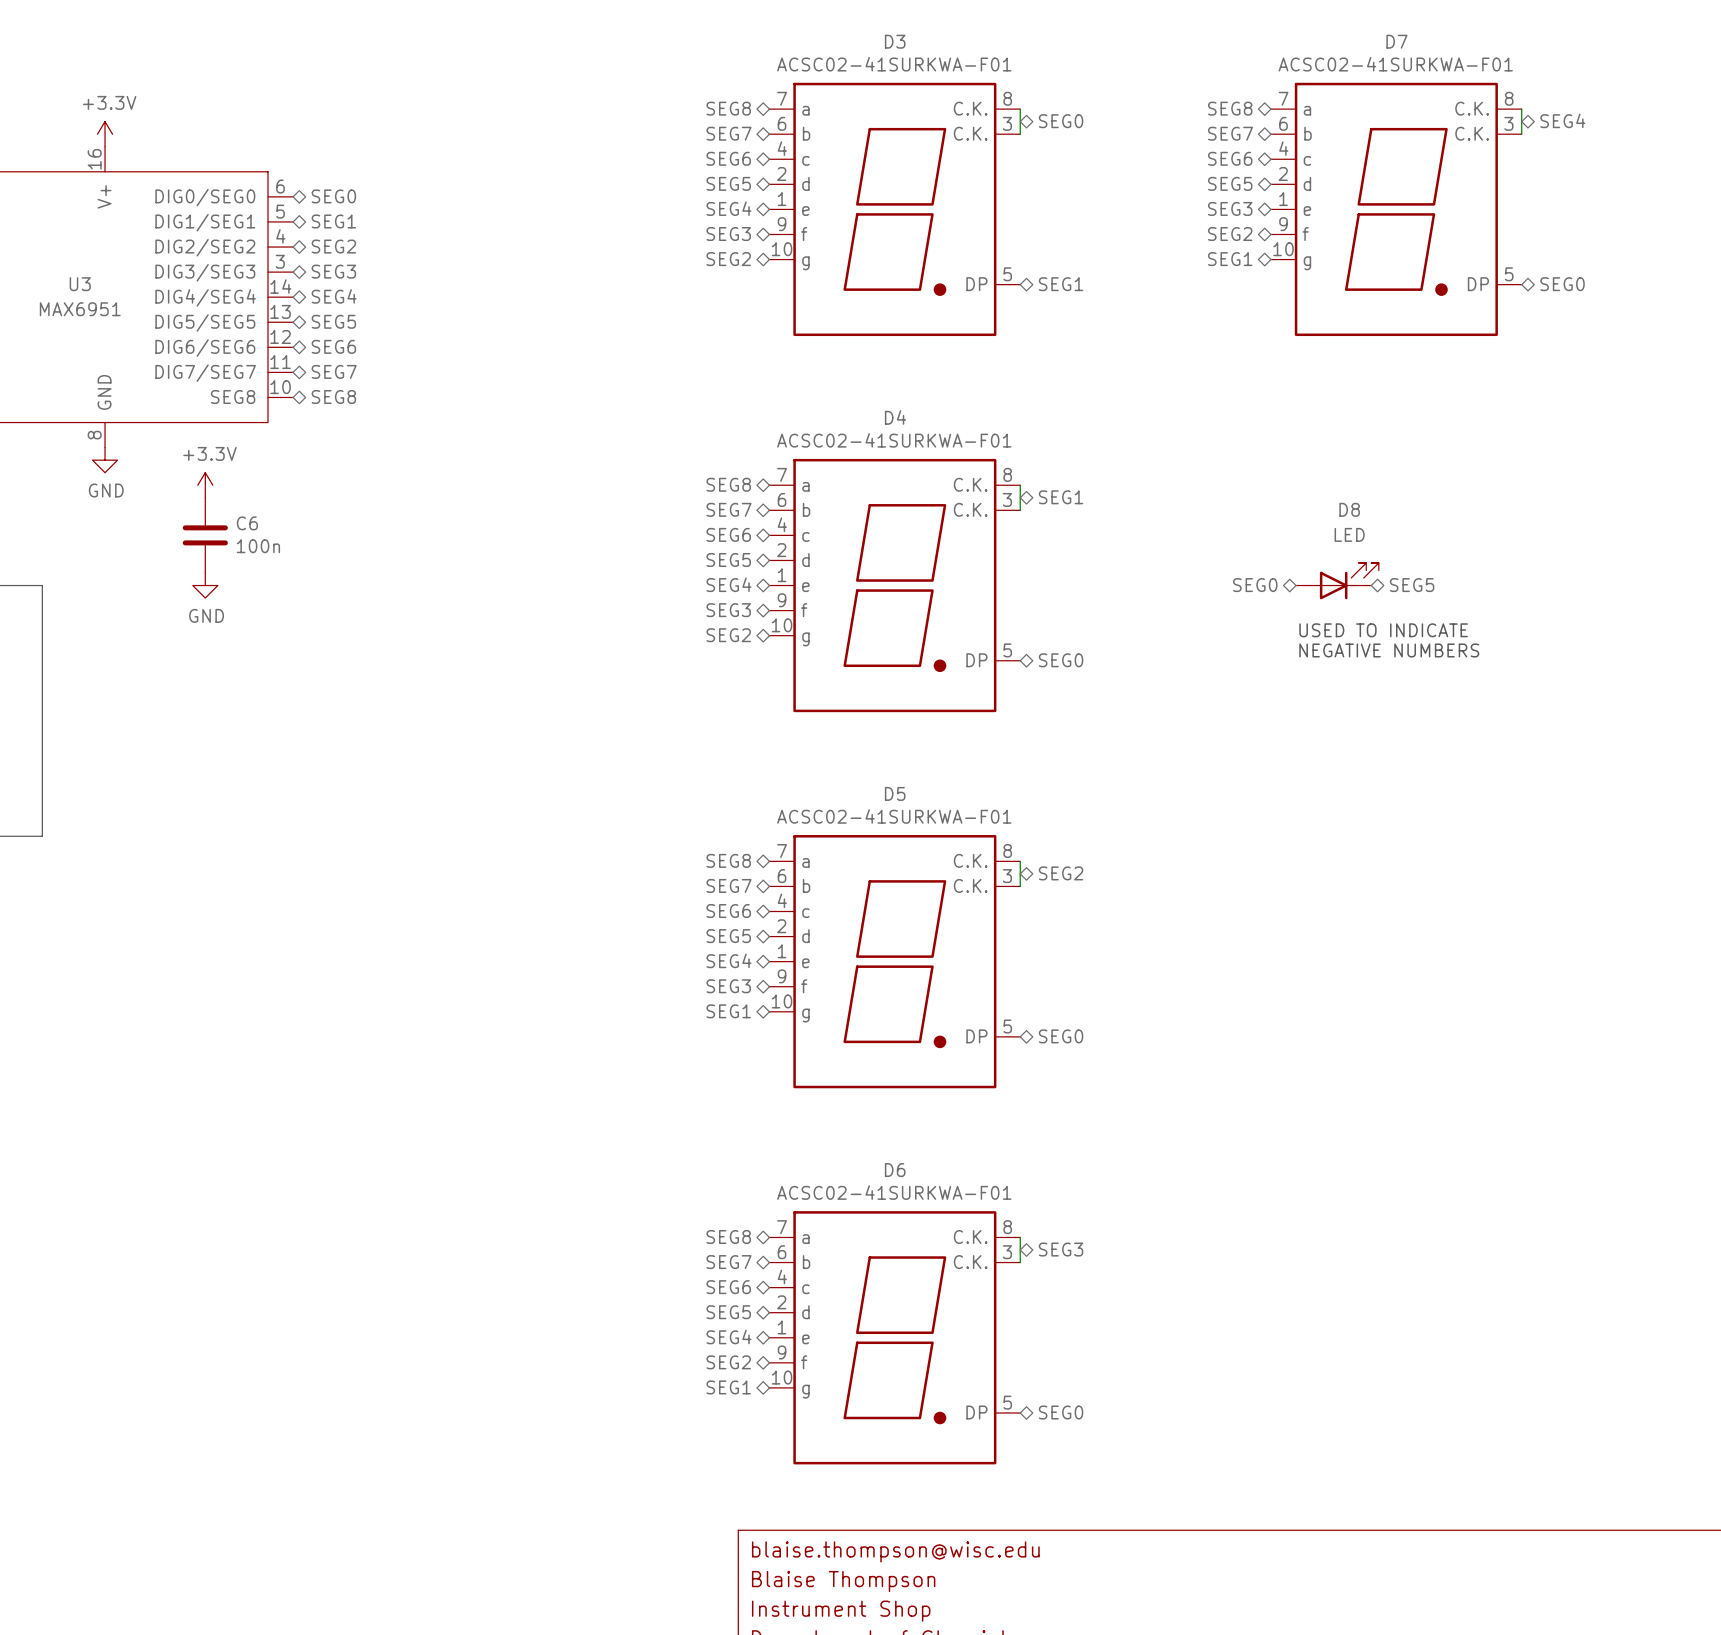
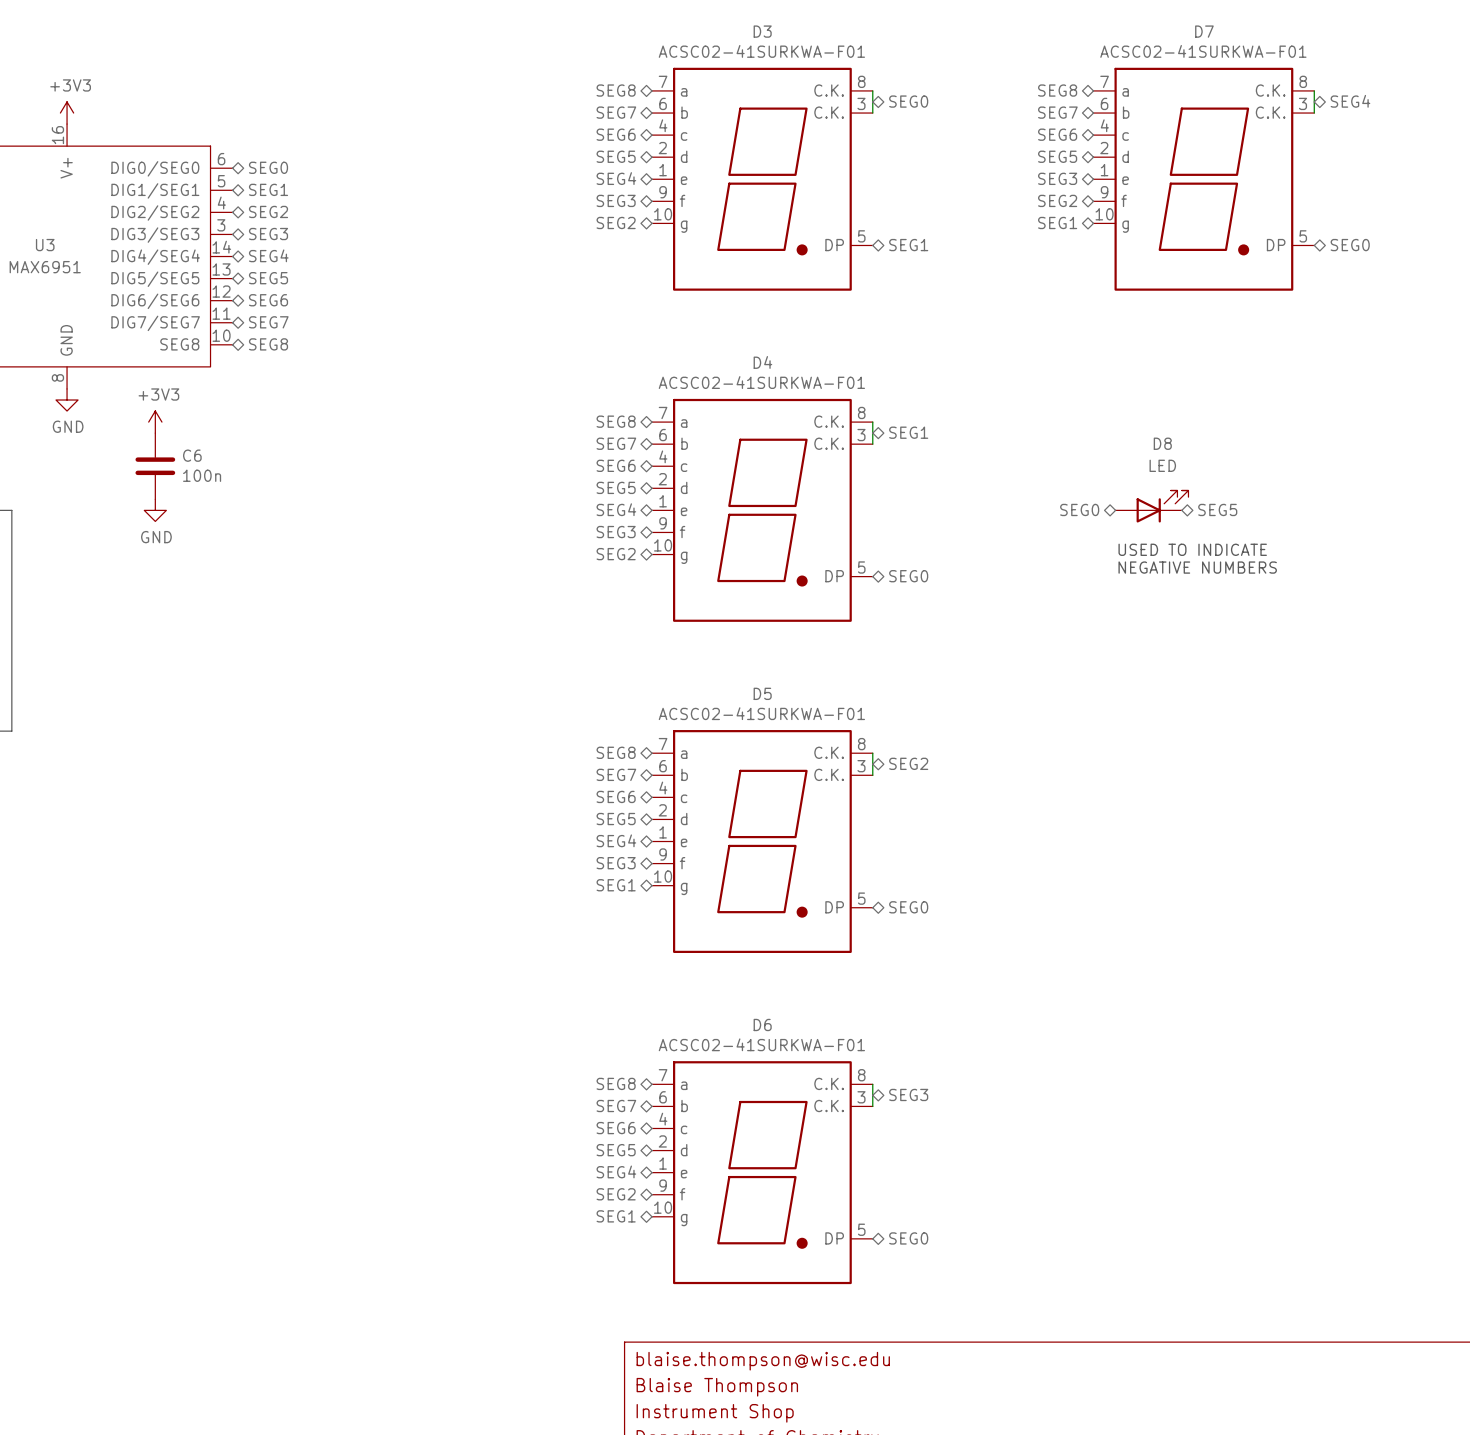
power symbol: +3.3V (105, 134) -> +3V3 (67, 113)
power symbol: +3.3V (205, 485) -> +3V3 (155, 422)

